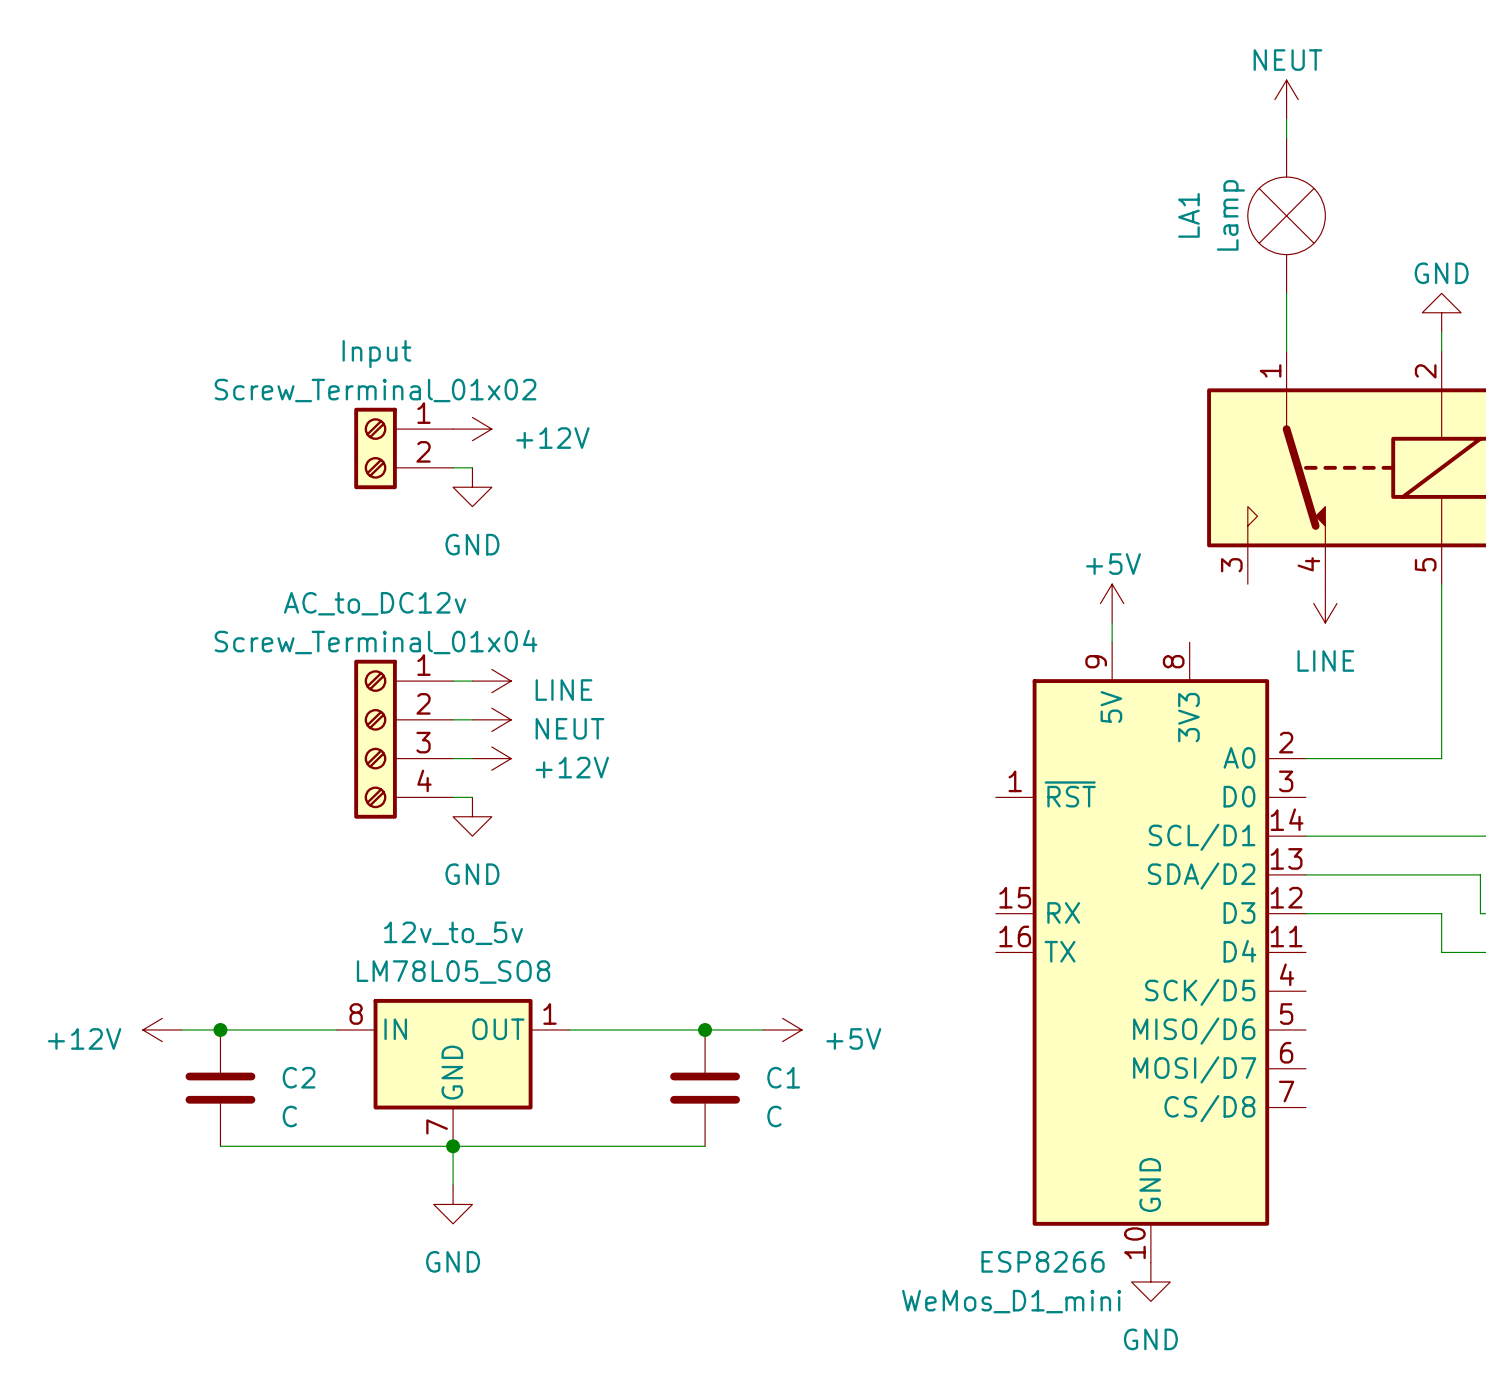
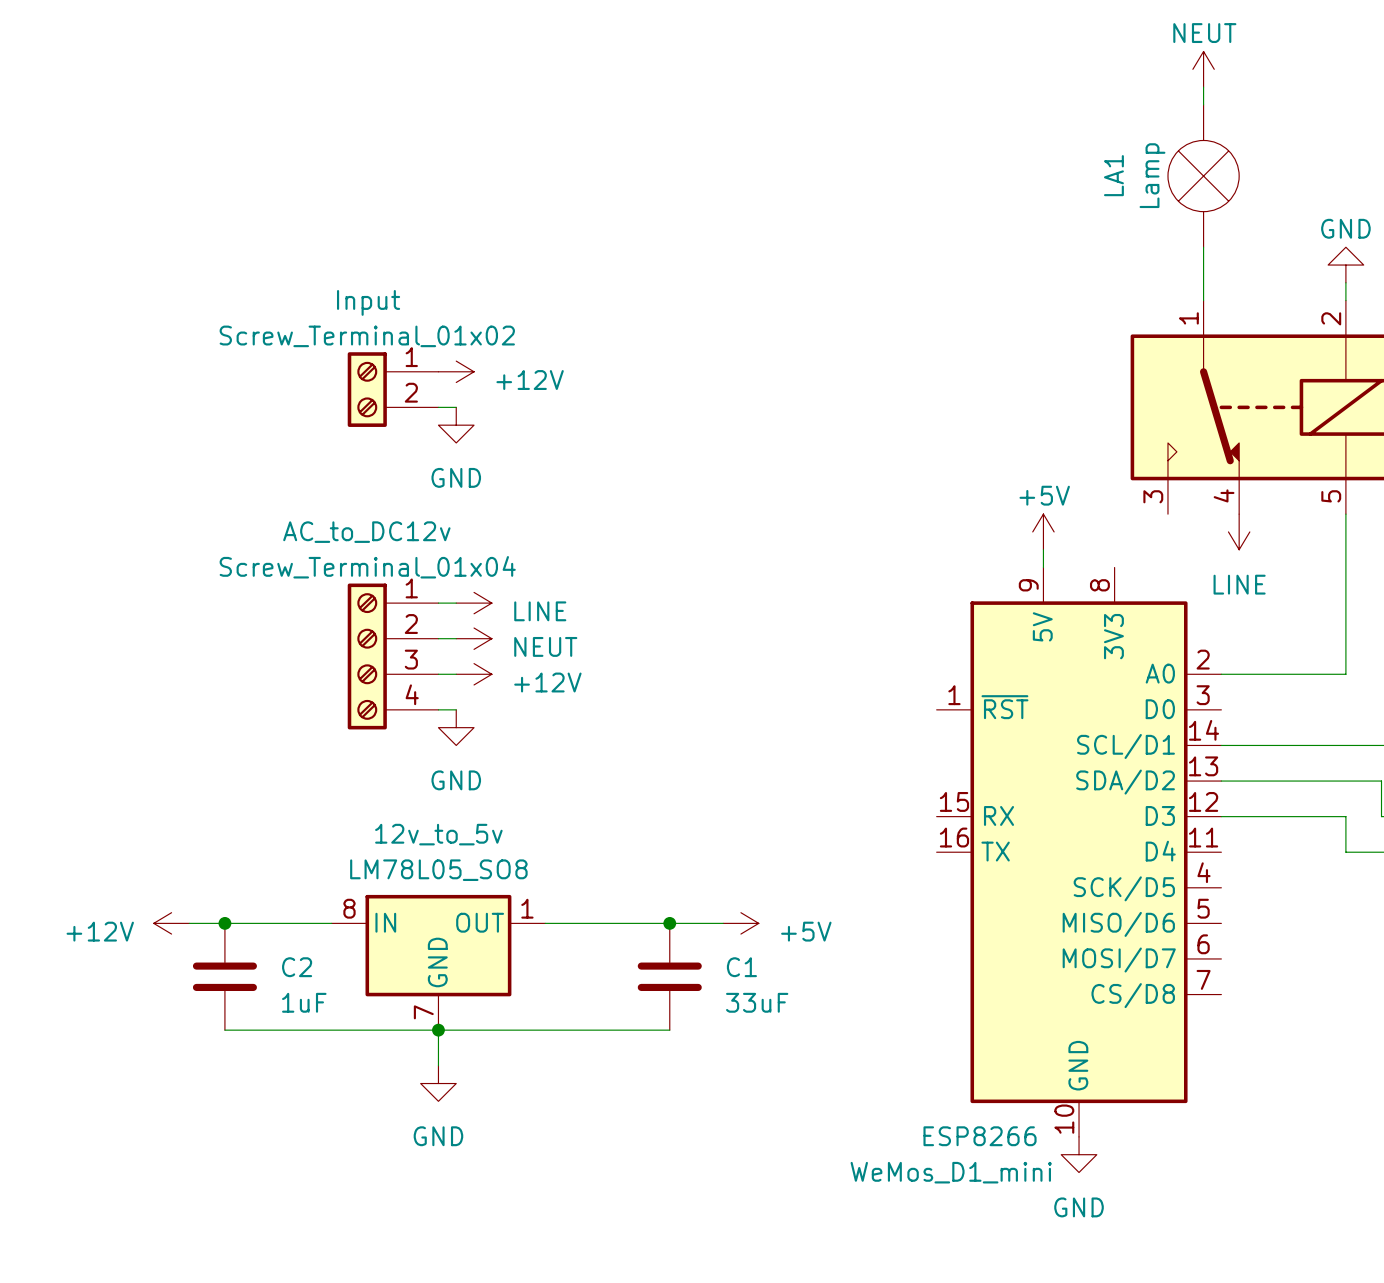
C2 value: C (289, 1116) -> 1uF (304, 1002)
C1 value: C (774, 1116) -> 33uF (757, 1002)

